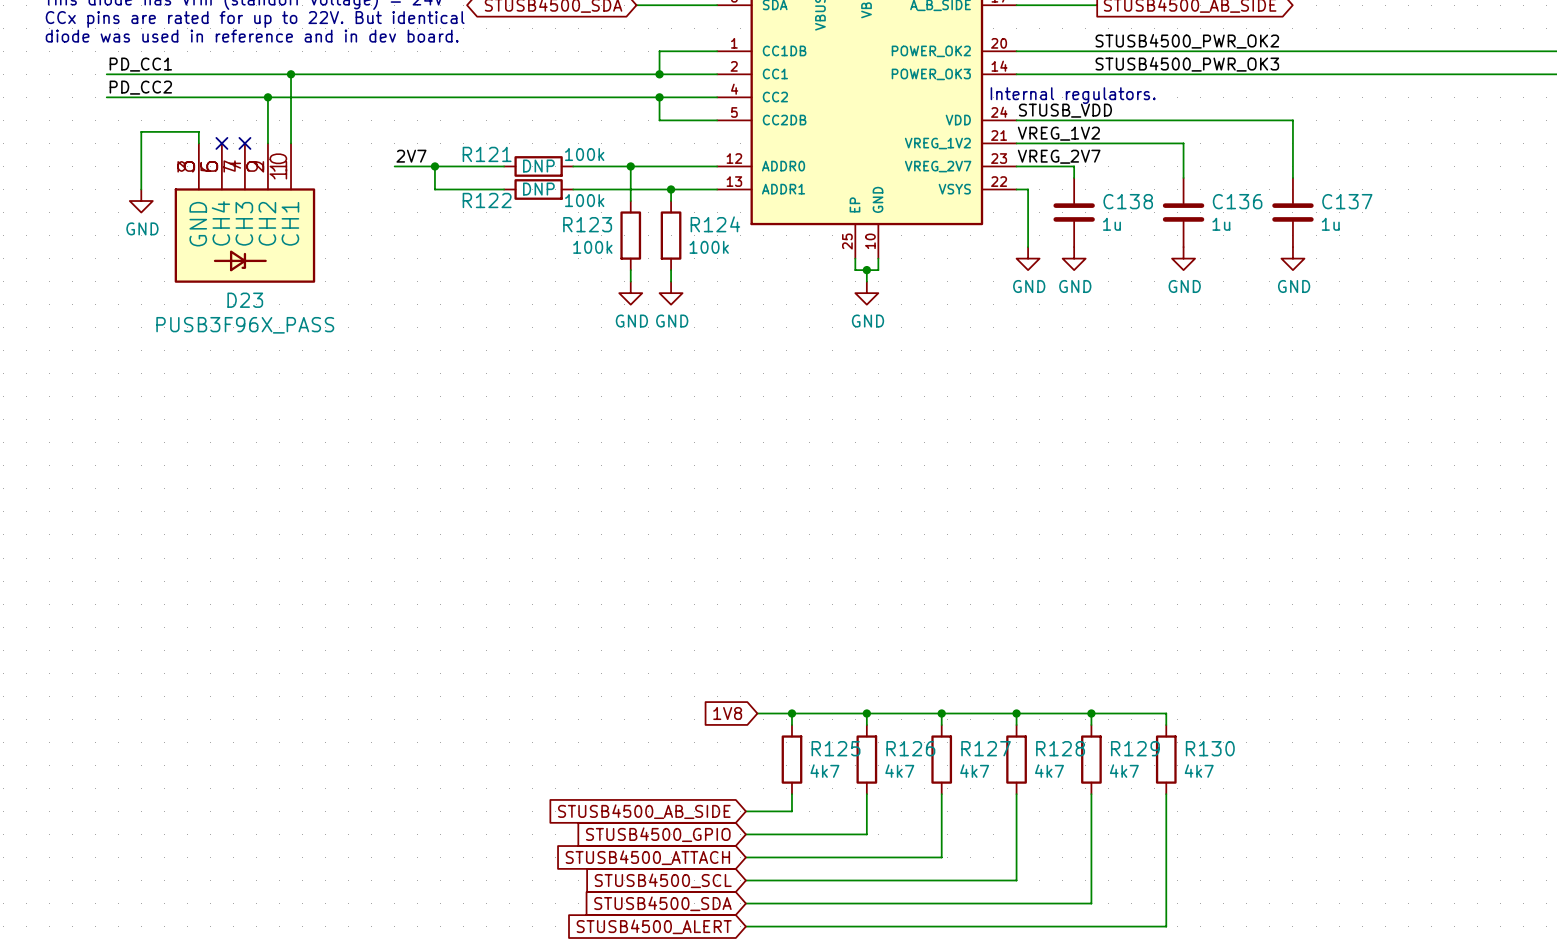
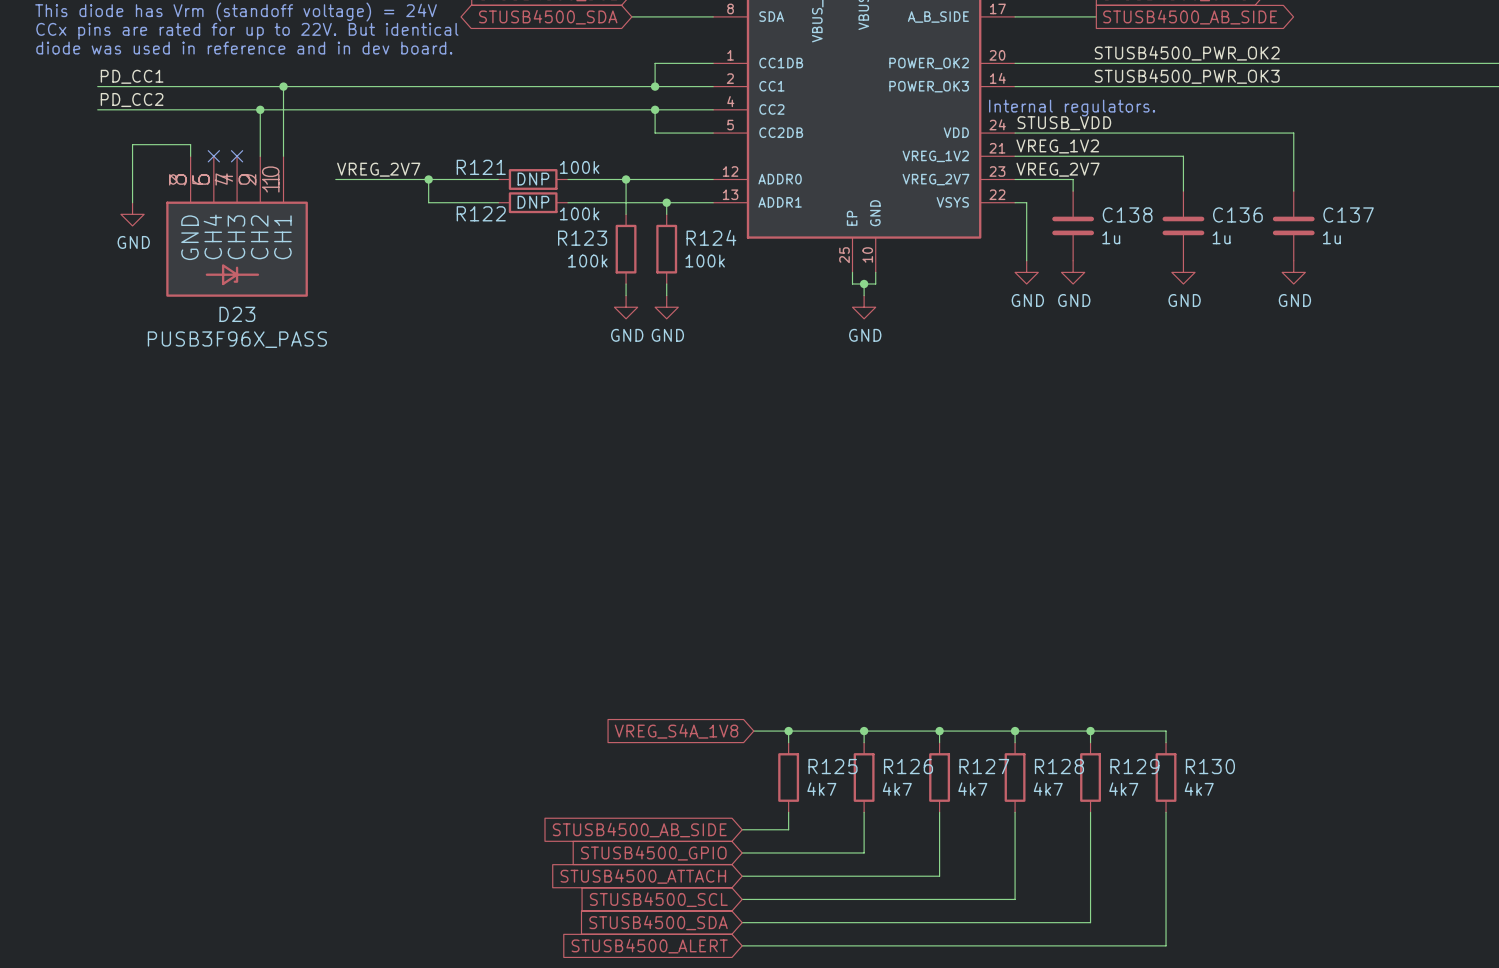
label: none -> VREG_2V7 (378, 169)
label: 2V7 (411, 156) -> none
wire: none -> (335, 179) (388, 179)
global label: 1V8 (727, 713) -> VREG_S4A_1V8 (676, 731)

